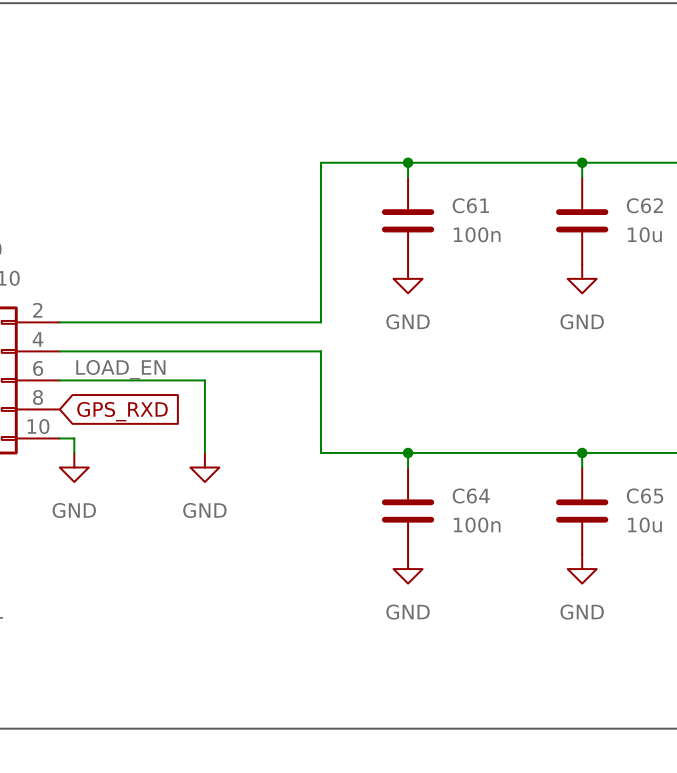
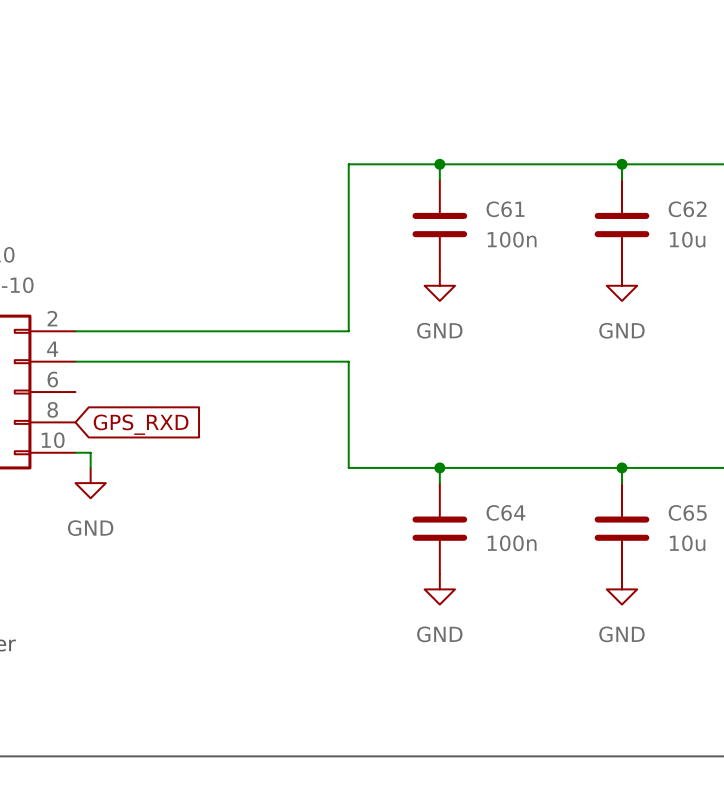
label: LOAD_EN (120, 369) -> none
wire: (59, 380) (204, 380) (204, 452) -> none
power symbol: GND (204, 467) -> none

